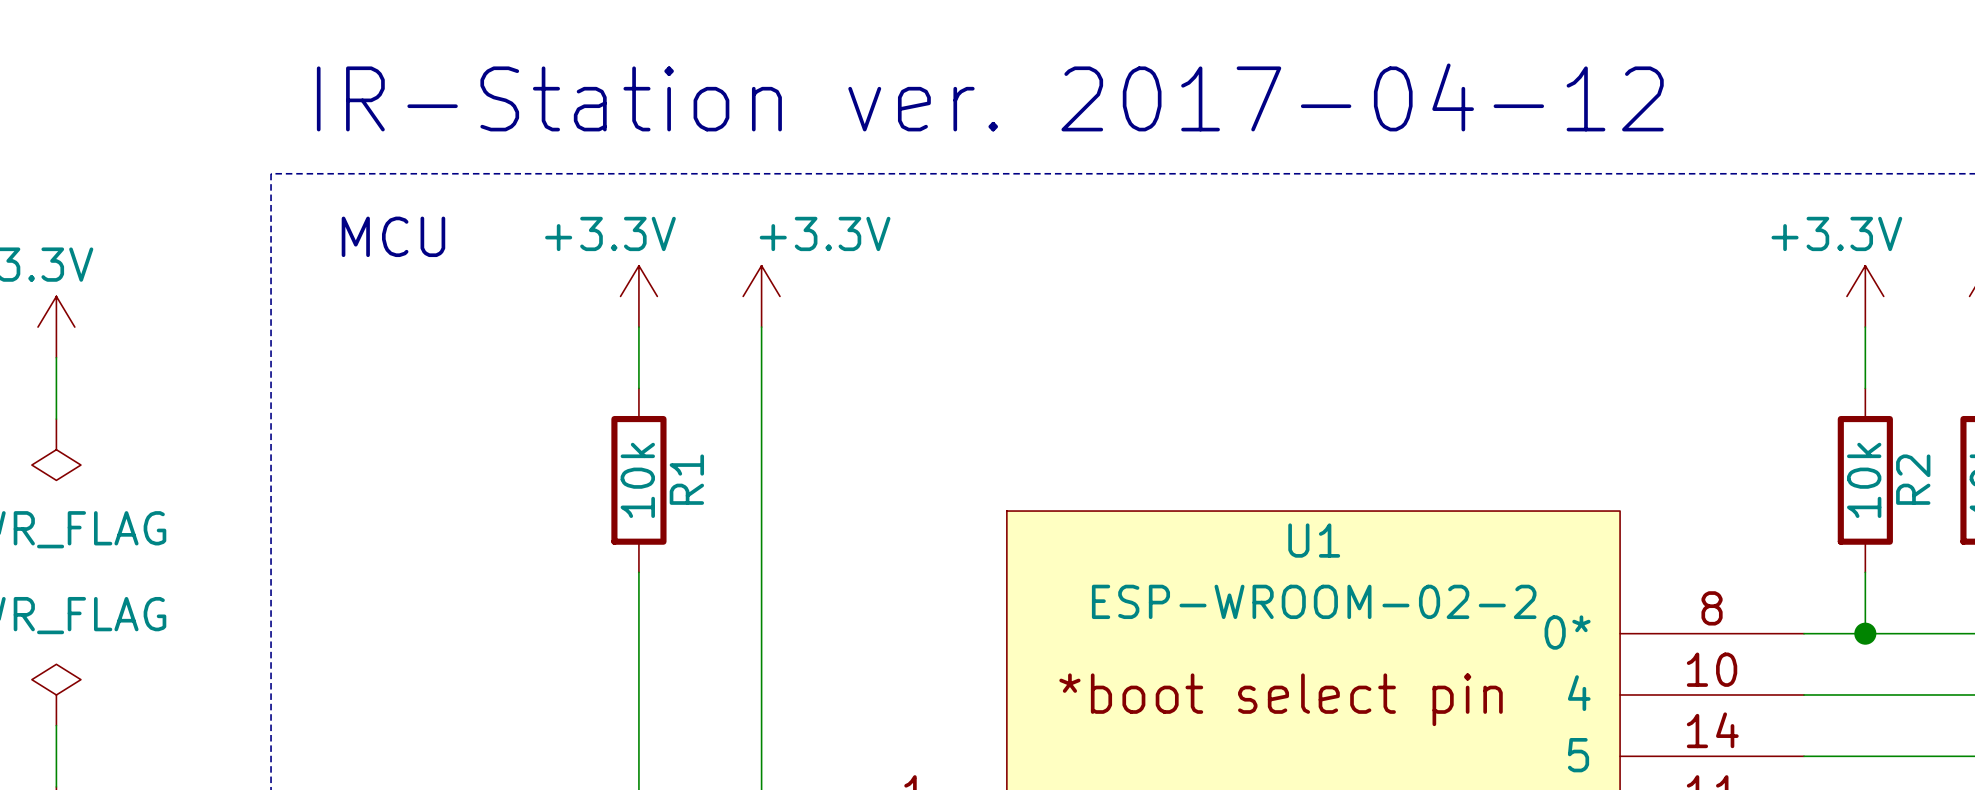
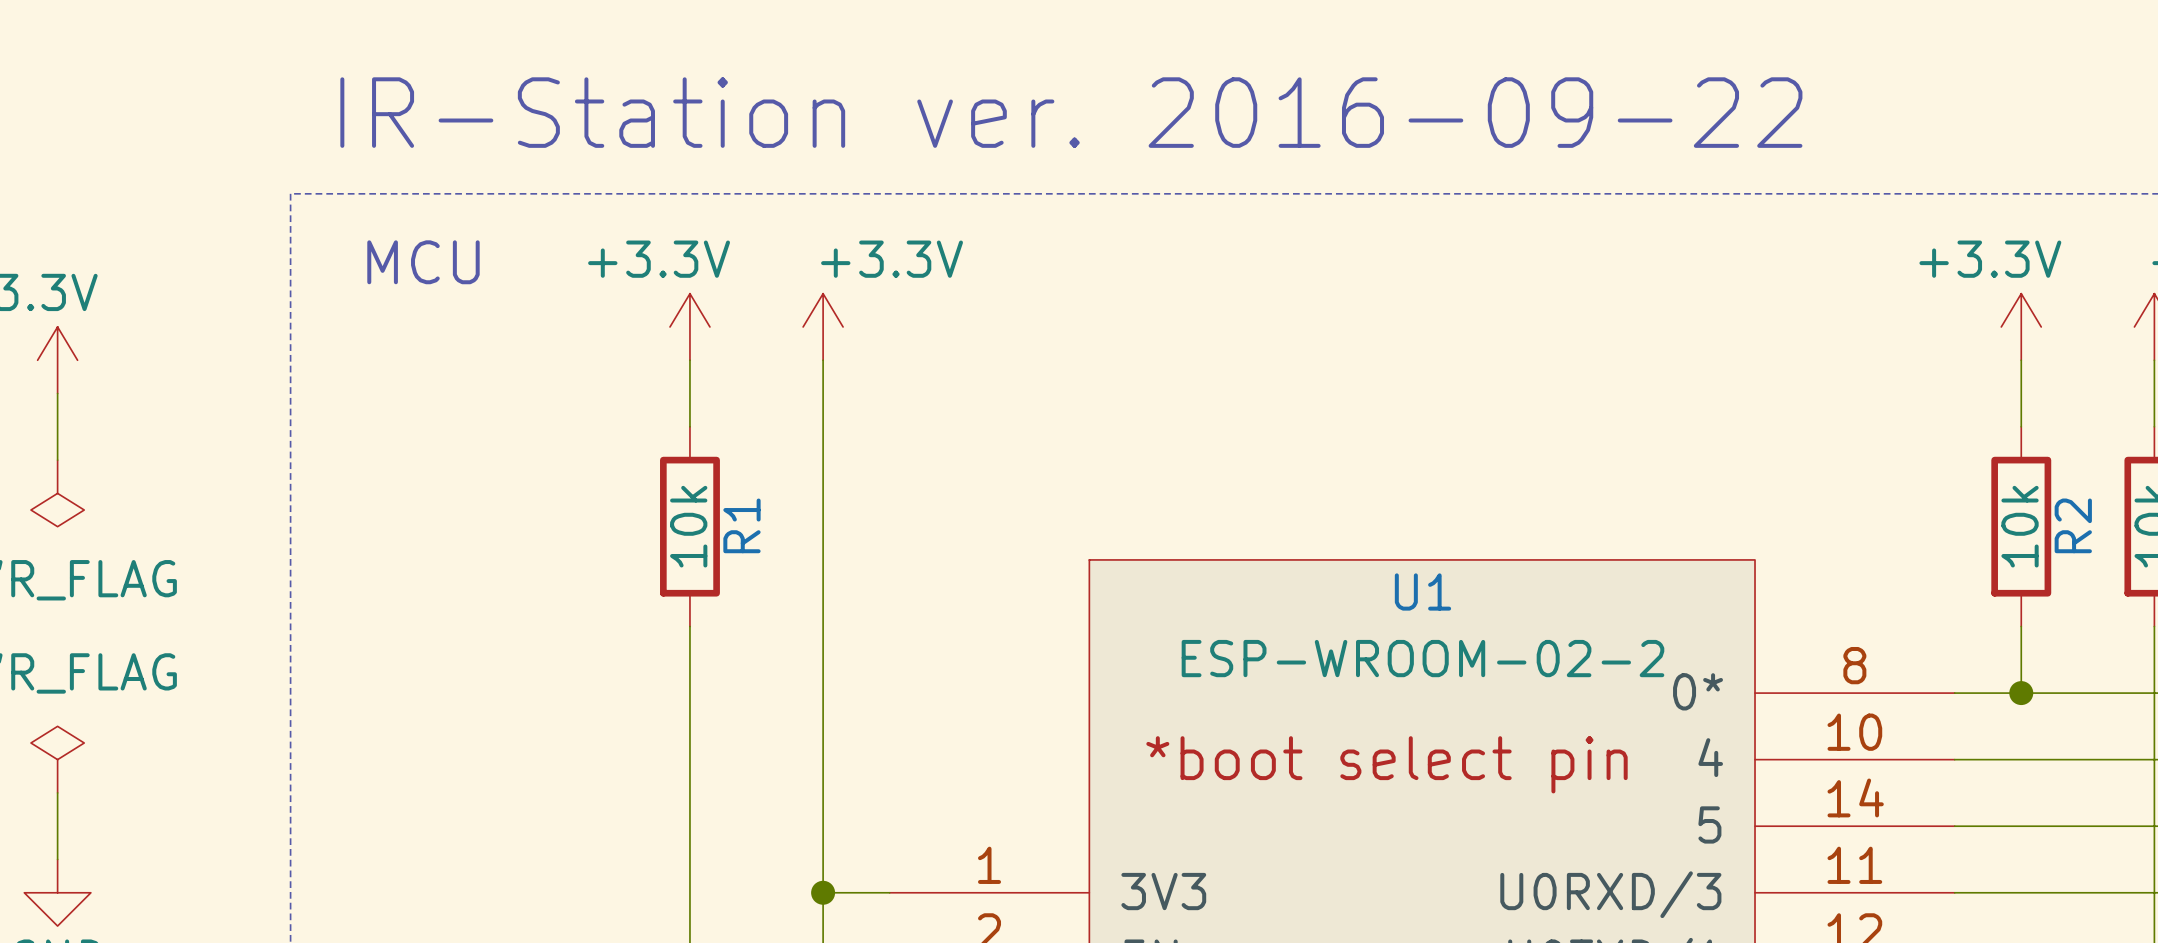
text: IR-Station ver. 2017-04-12 (990, 97) -> IR-Station ver. 2016-09-22 (1071, 112)

